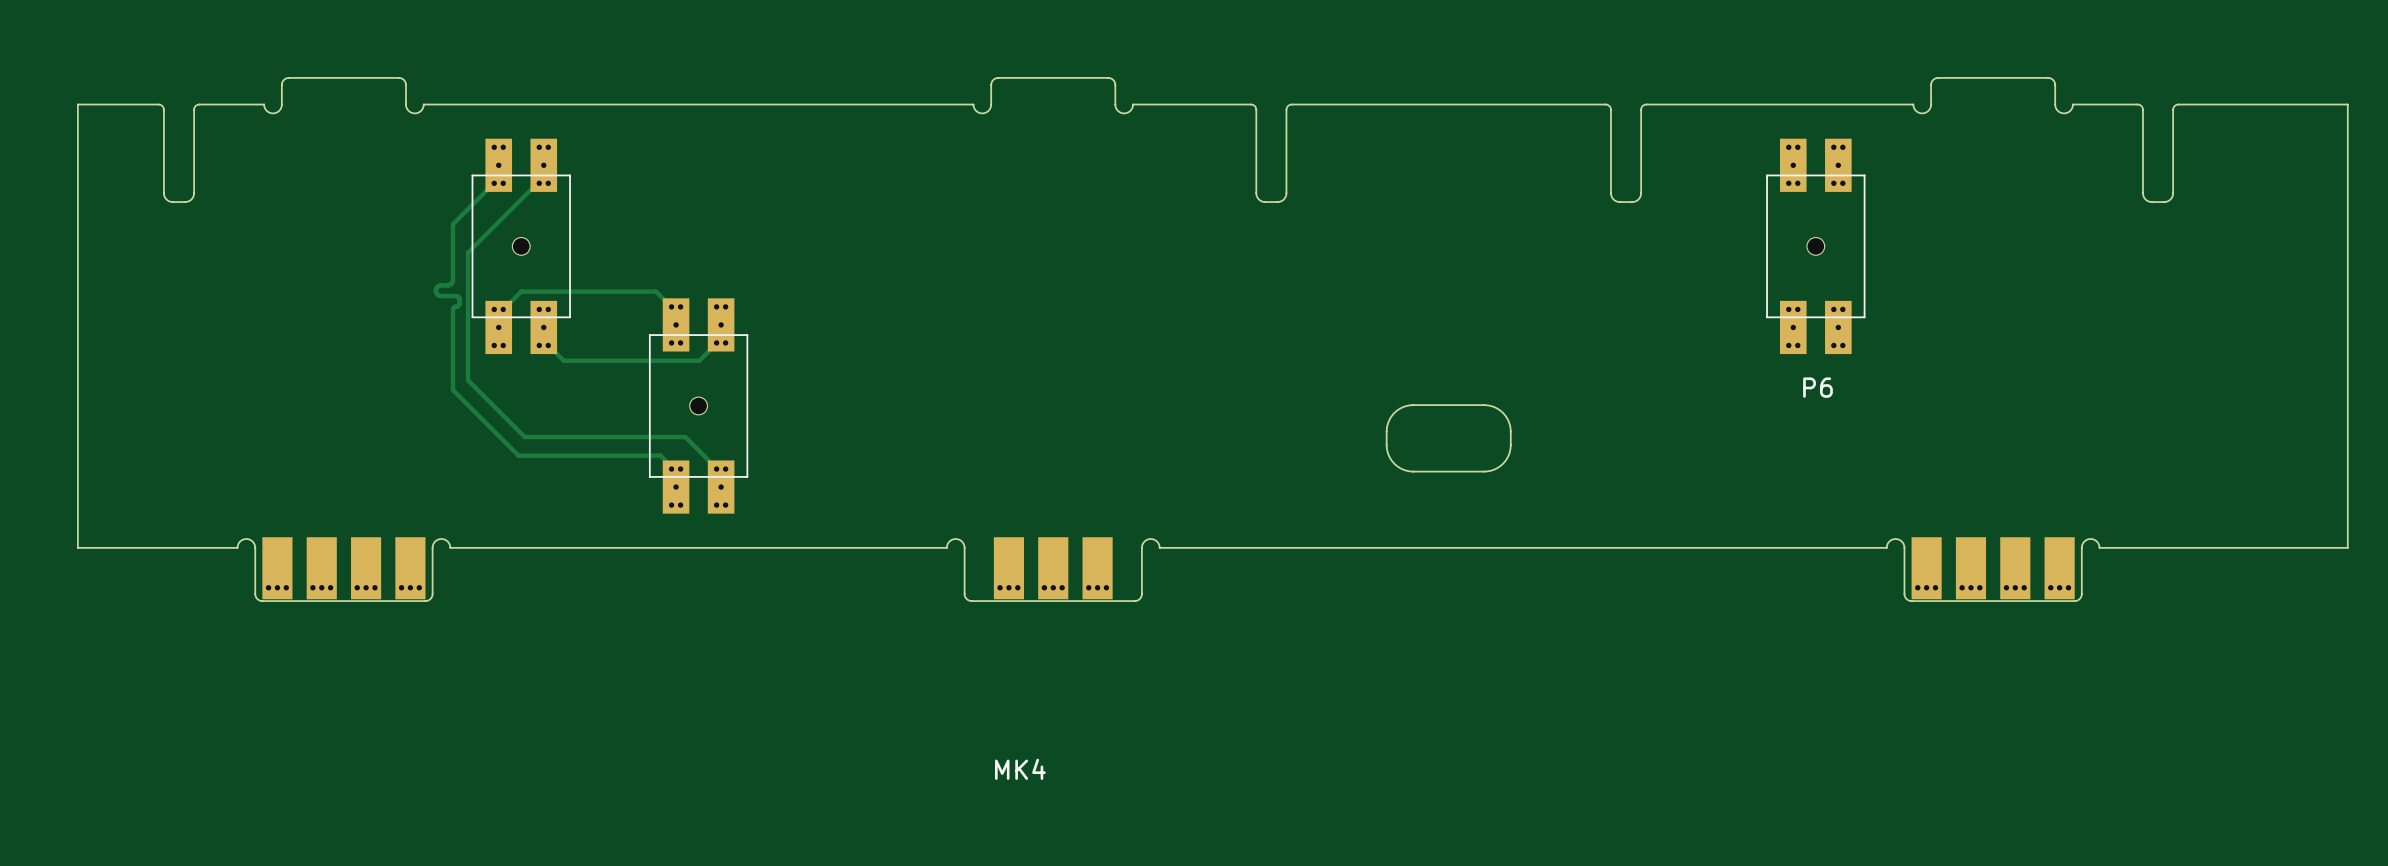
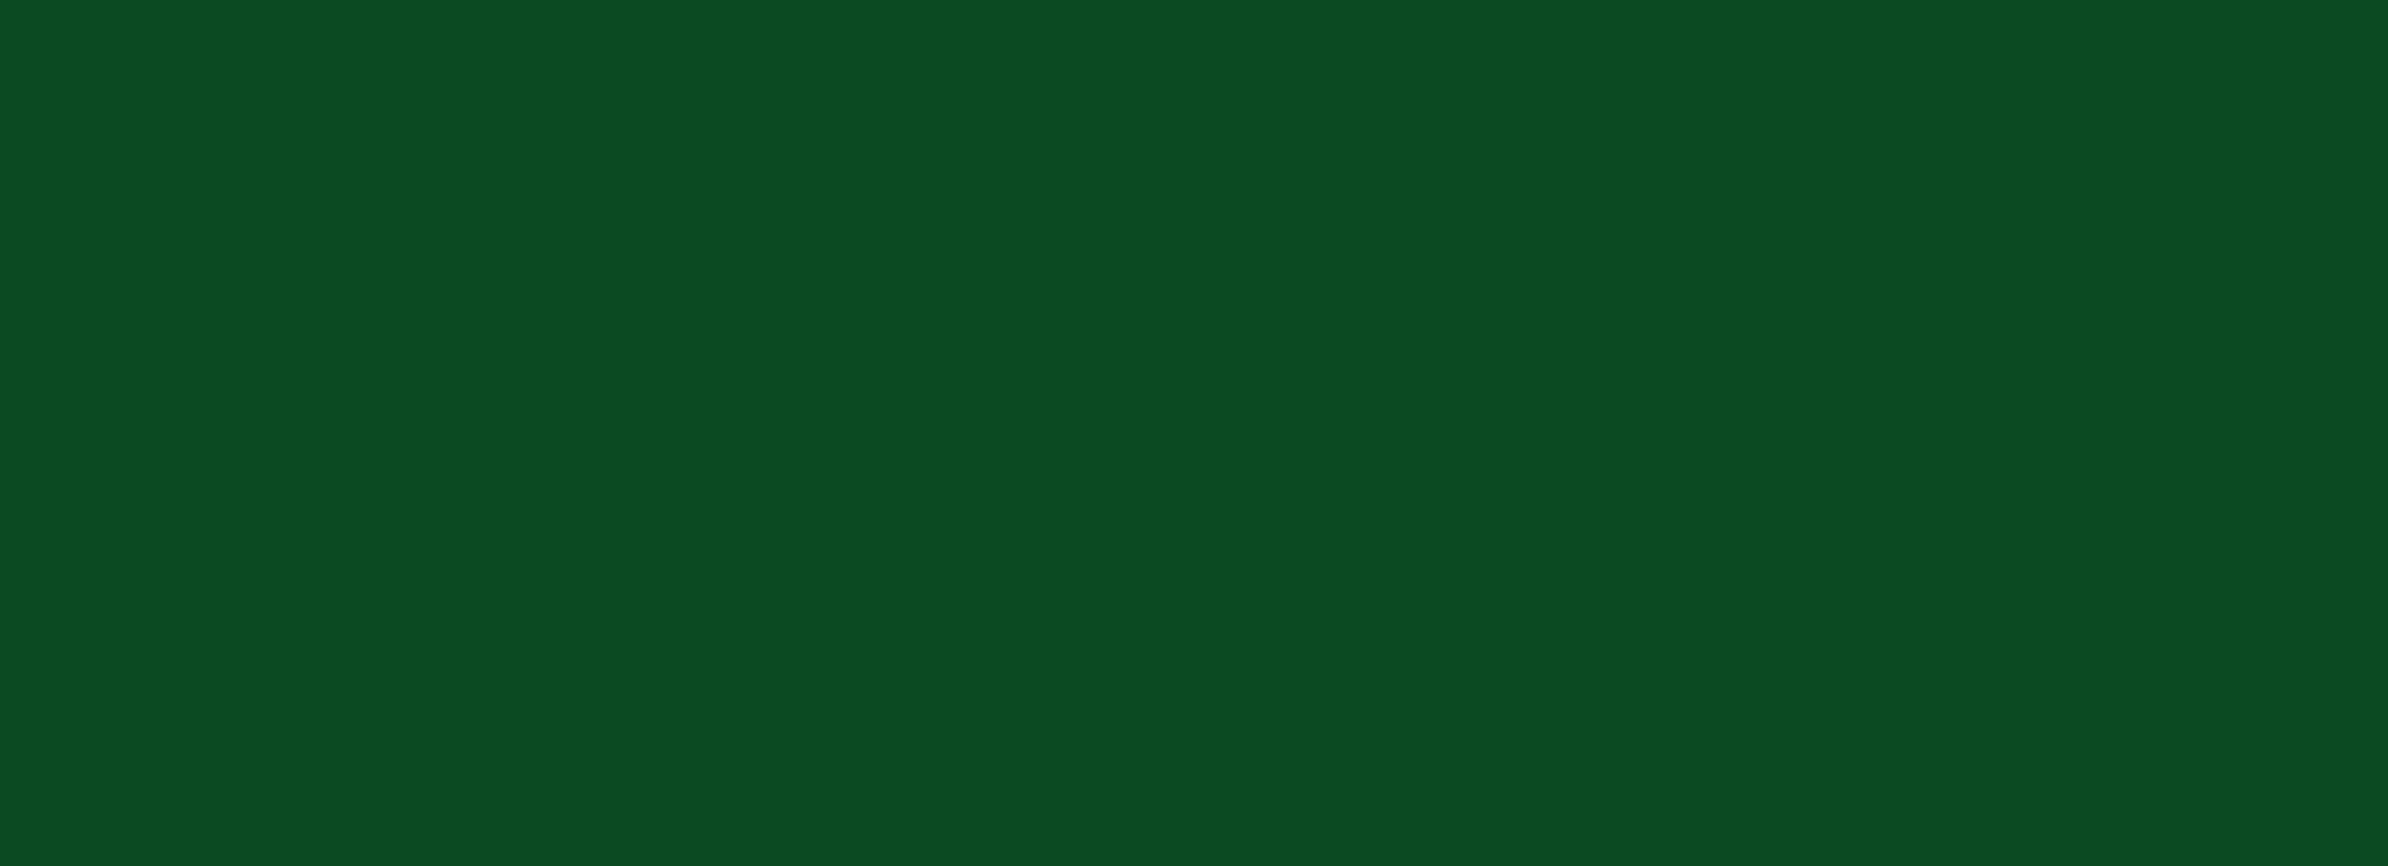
drawing: [280, 77, 407, 106] -> none
drawing: [990, 77, 1117, 106] -> none
drawing: [1930, 77, 2057, 106] -> none
board edge: (281, 104) (279, 110) (272, 113) (266, 110) (264, 104) (195, 106) (194, 194) (191, 199) (185, 202) (170, 201) (164, 195) (162, 106) (77, 104) (77, 547) (237, 547) (240, 541) (246, 538) (252, 541) (255, 547) -> none
board edge: (405, 104) (408, 110) (414, 113) (421, 110) (423, 104) (973, 104) (976, 110) (982, 113) (988, 110) (991, 104) -> none
board edge: (1115, 104) (1117, 110) (1124, 113) (1130, 110) (1133, 104) (1253, 105) (1256, 109) (1256, 194) (1258, 199) (1265, 202) (1279, 201) (1286, 195) (1286, 109) (1291, 104) (1607, 104) (1610, 109) (1611, 195) (1617, 201) (1632, 202) (1638, 199) (1641, 194) (1641, 109) (1645, 104) (1913, 104) (1915, 110) (1922, 113) (1928, 110) (1931, 104) -> none
board edge: (2055, 104) (2057, 110) (2064, 113) (2070, 110) (2072, 104) (2141, 106) (2143, 194) (2145, 199) (2151, 202) (2166, 201) (2172, 195) (2173, 109) (2175, 105) (2347, 104) (2347, 547) (2099, 547) (2096, 541) (2090, 538) (2084, 541) (2081, 547) -> none
track: (498, 165) (498, 178) (452, 224) (452, 281) (448, 285) (438, 285) (435, 289) (438, 295) (456, 296) (459, 298) (459, 304) (452, 309) (452, 390) (518, 455) (660, 455) (676, 471) (676, 487) -> none
track: (543, 165) (543, 176) (468, 252) (468, 380) (524, 437) (685, 437) (721, 472) (721, 487) -> none
part: (521, 246) -> none
P6: (1815, 246) -> none
track: (676, 324) (676, 311) (656, 291) (521, 291) (498, 314) (498, 327) -> none
track: (721, 324) (721, 339) (699, 360) (563, 360) (543, 340) (543, 327) -> none
part: (698, 405) -> none
MK4: (1448, 438) -> none
board edge: (432, 547) (435, 541) (441, 538) (447, 541) (450, 547) (946, 547) (949, 541) (955, 538) (962, 541) (964, 547) -> none
board edge: (1141, 547) (1144, 541) (1150, 538) (1157, 541) (1159, 547) (1886, 547) (1889, 541) (1895, 538) (1901, 541) (1904, 547) -> none
part: (343, 569) -> none
part: (1053, 569) -> none
part: (1993, 569) -> none

